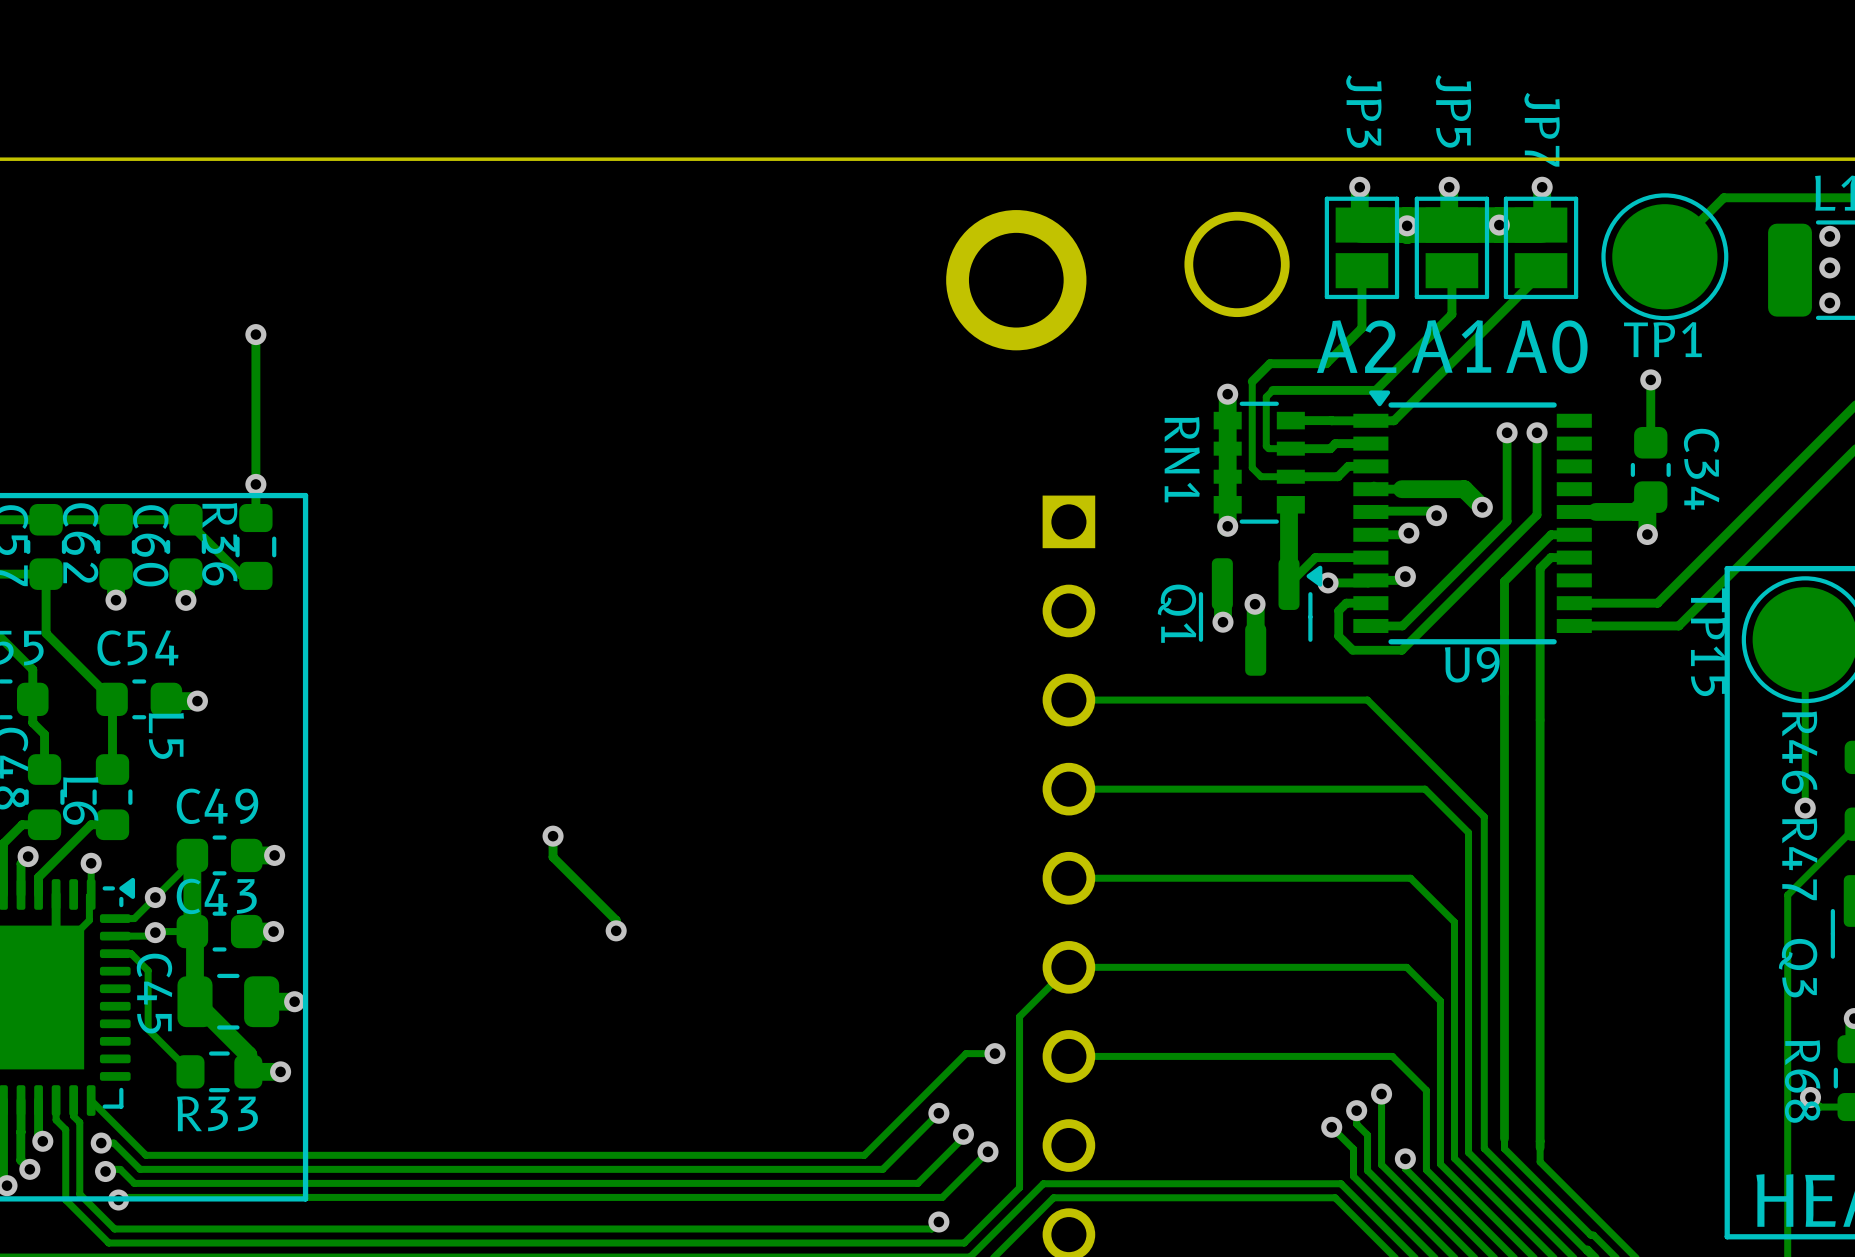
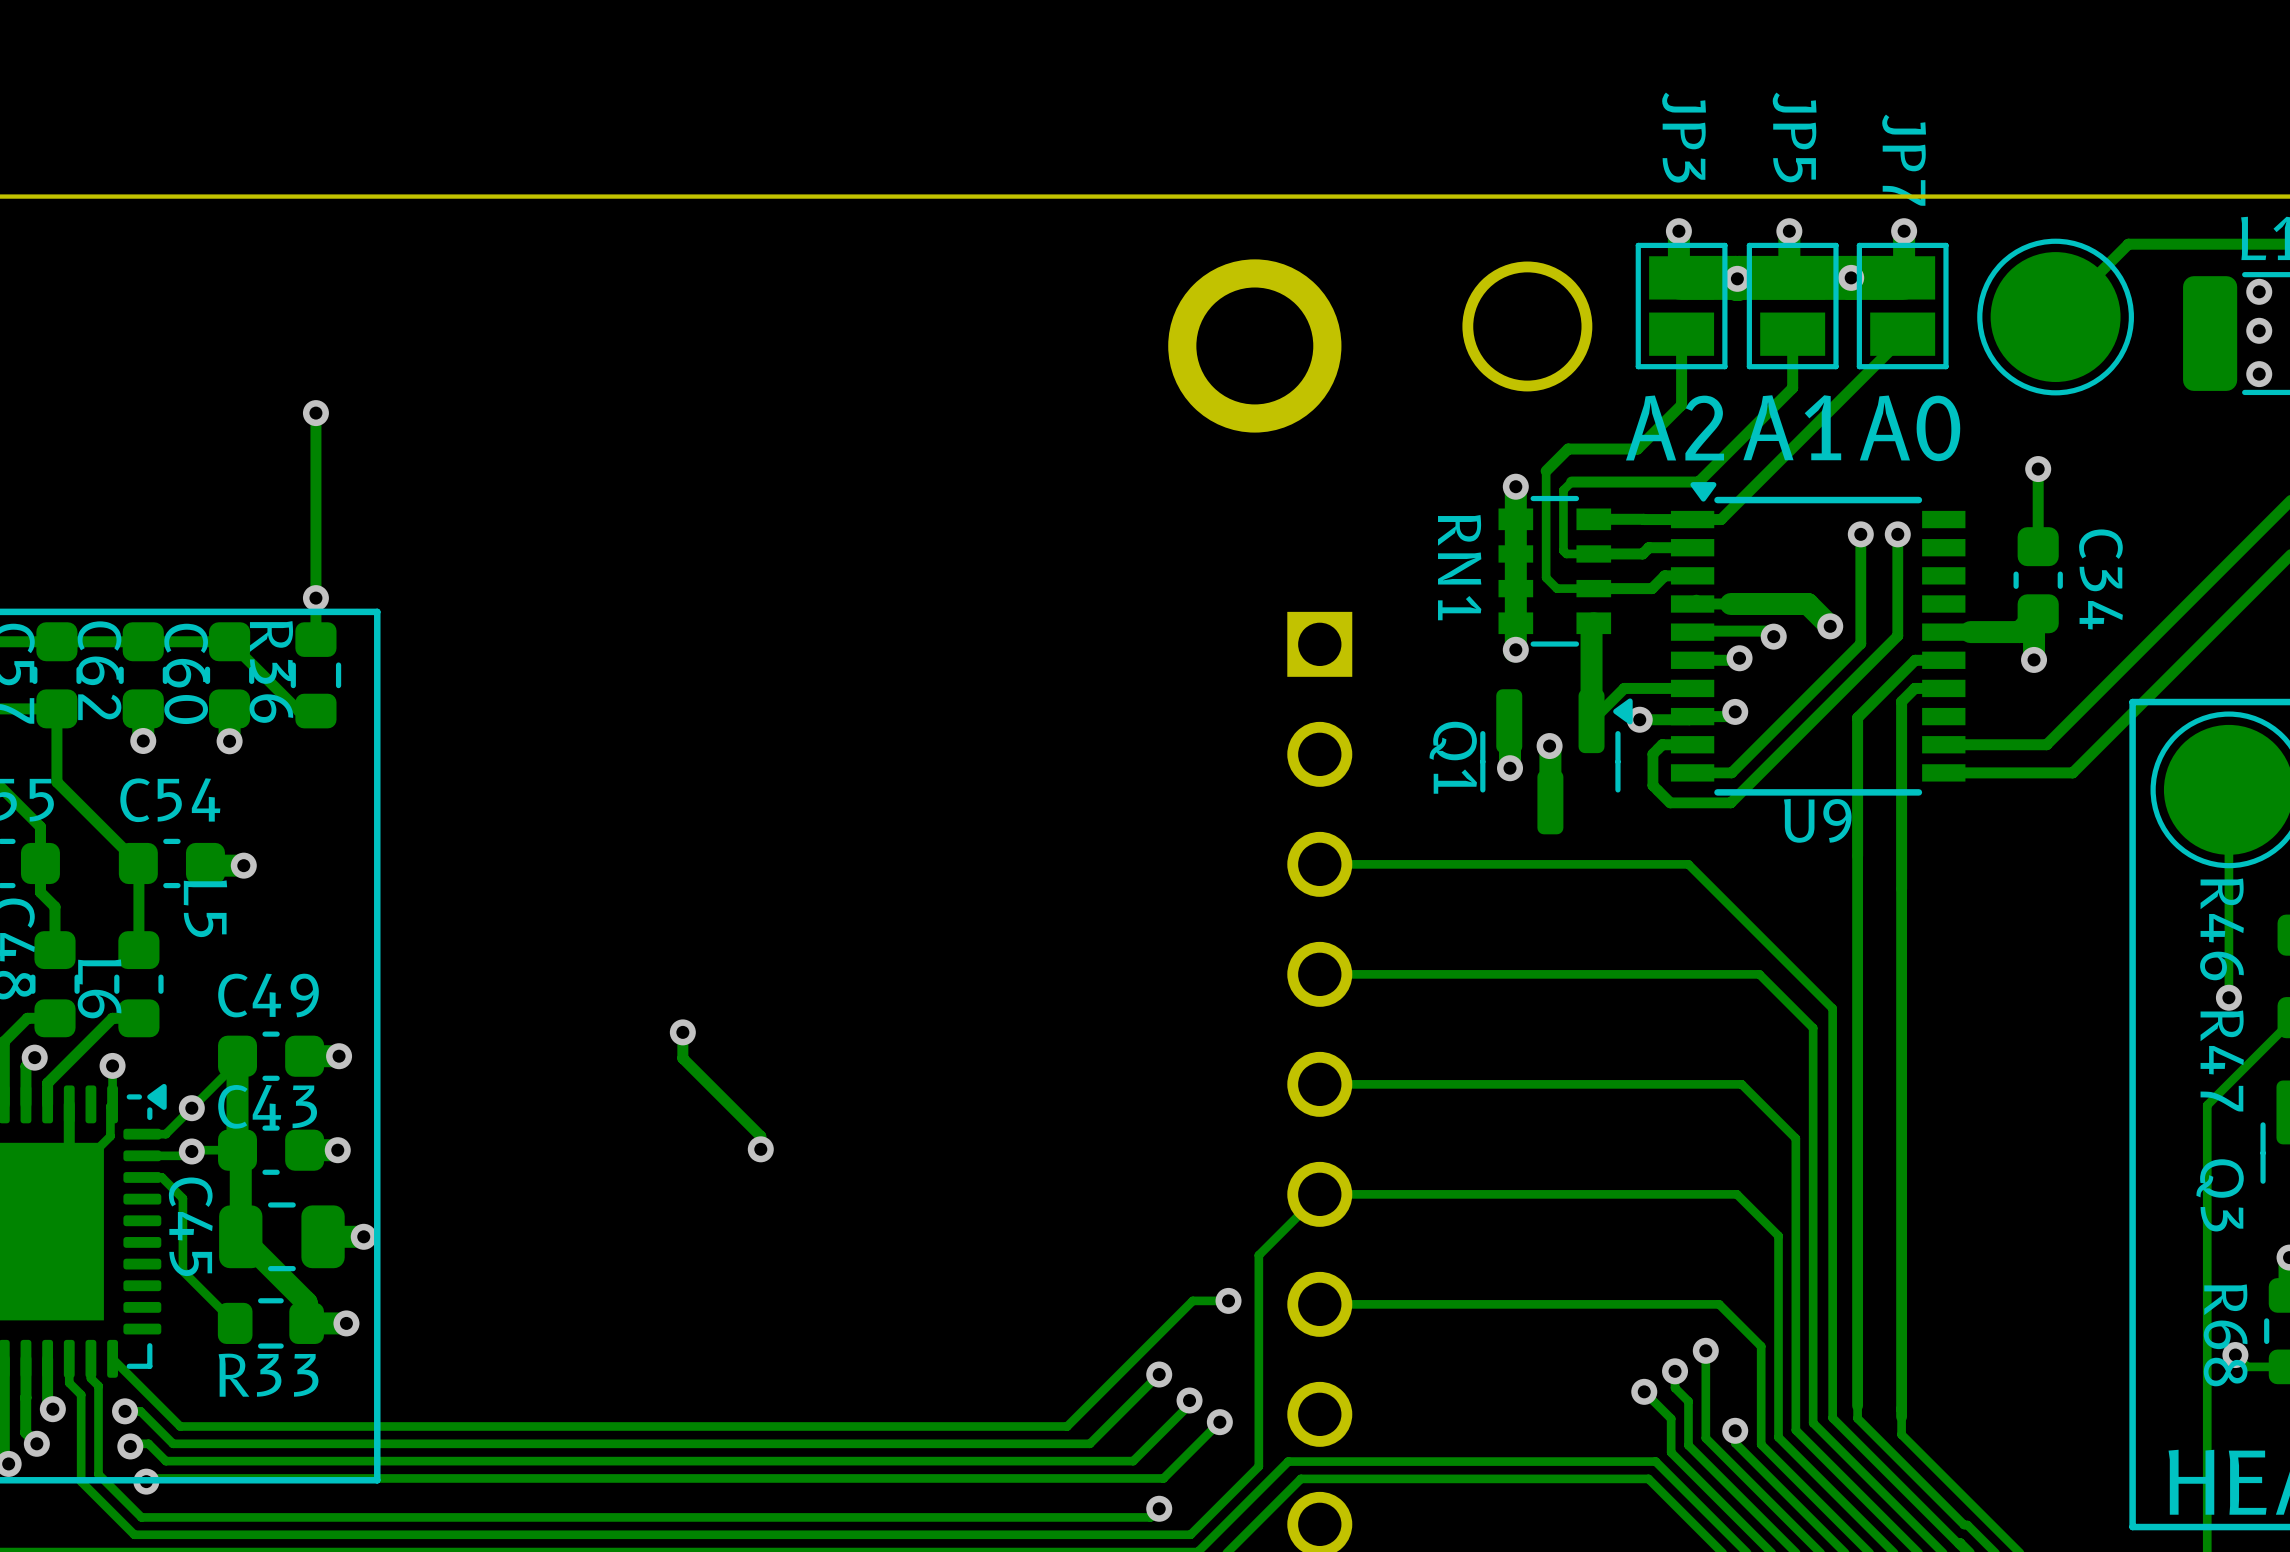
TP1 name: TP1 (1662, 339) -> none
TP15 name: TP15 (1708, 642) -> none

